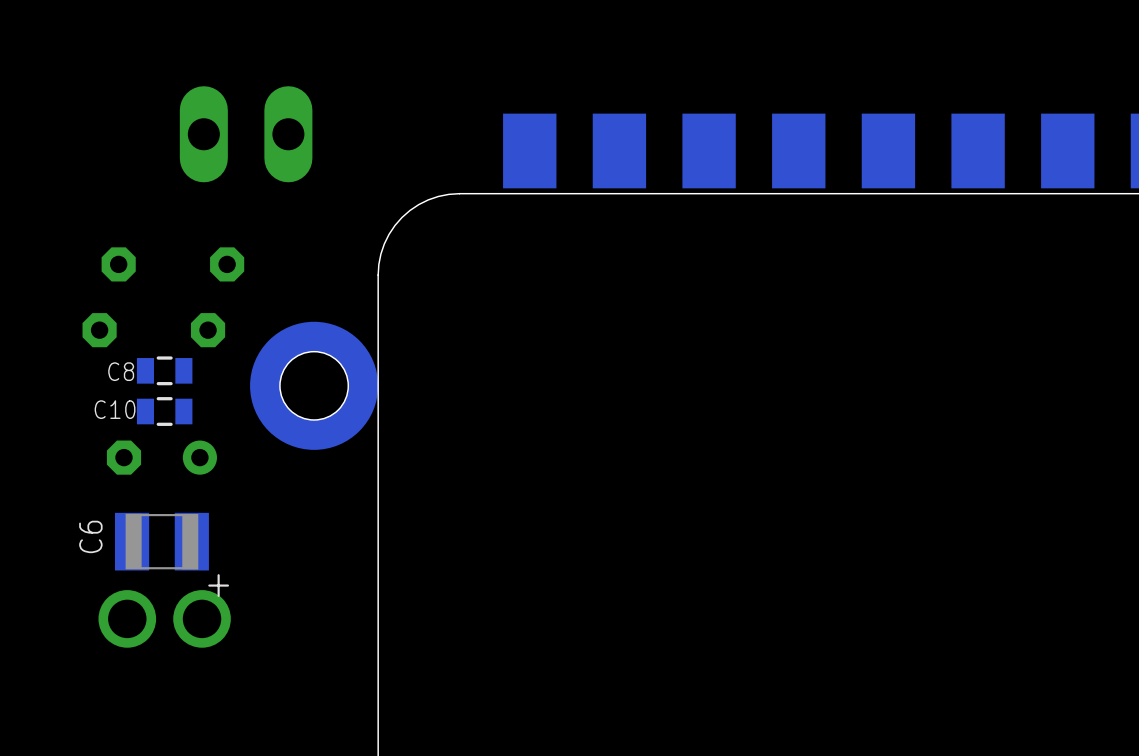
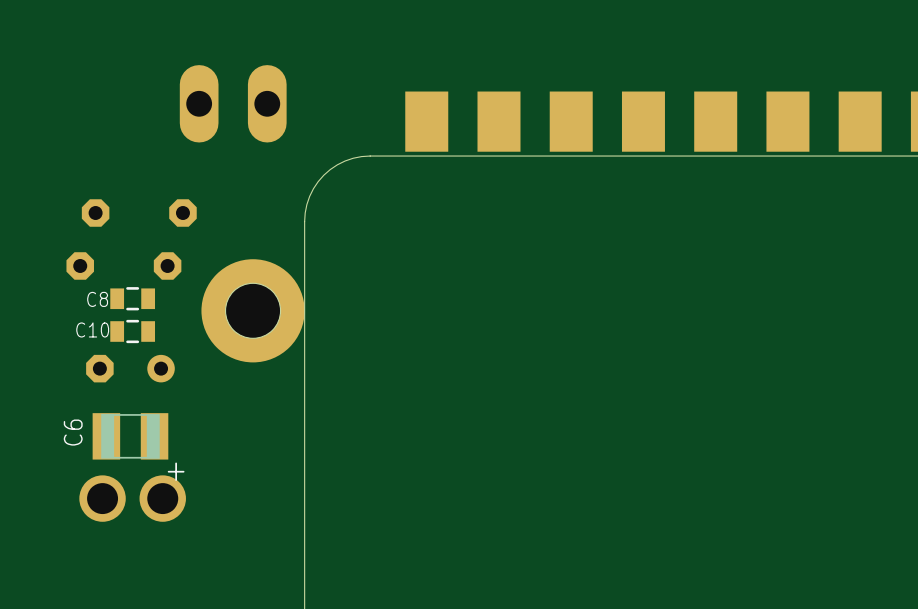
part position: (246, 134) -> (233, 103)

